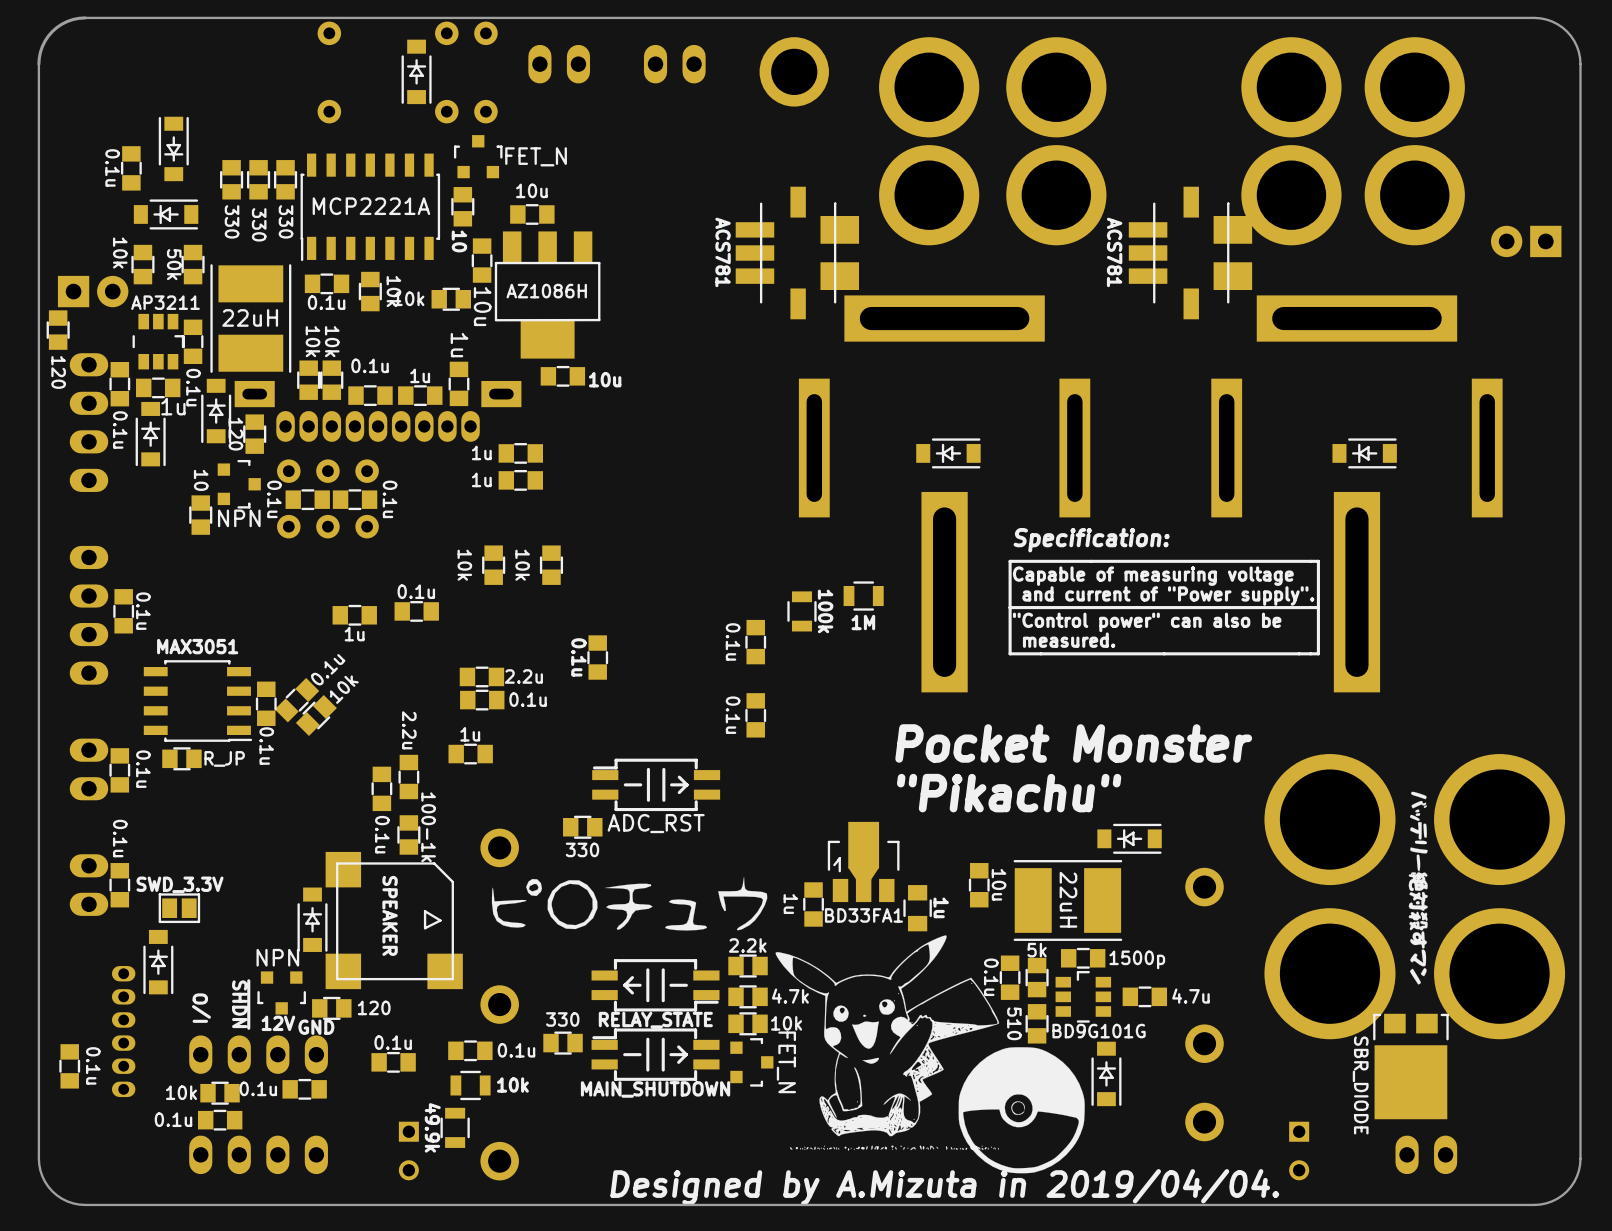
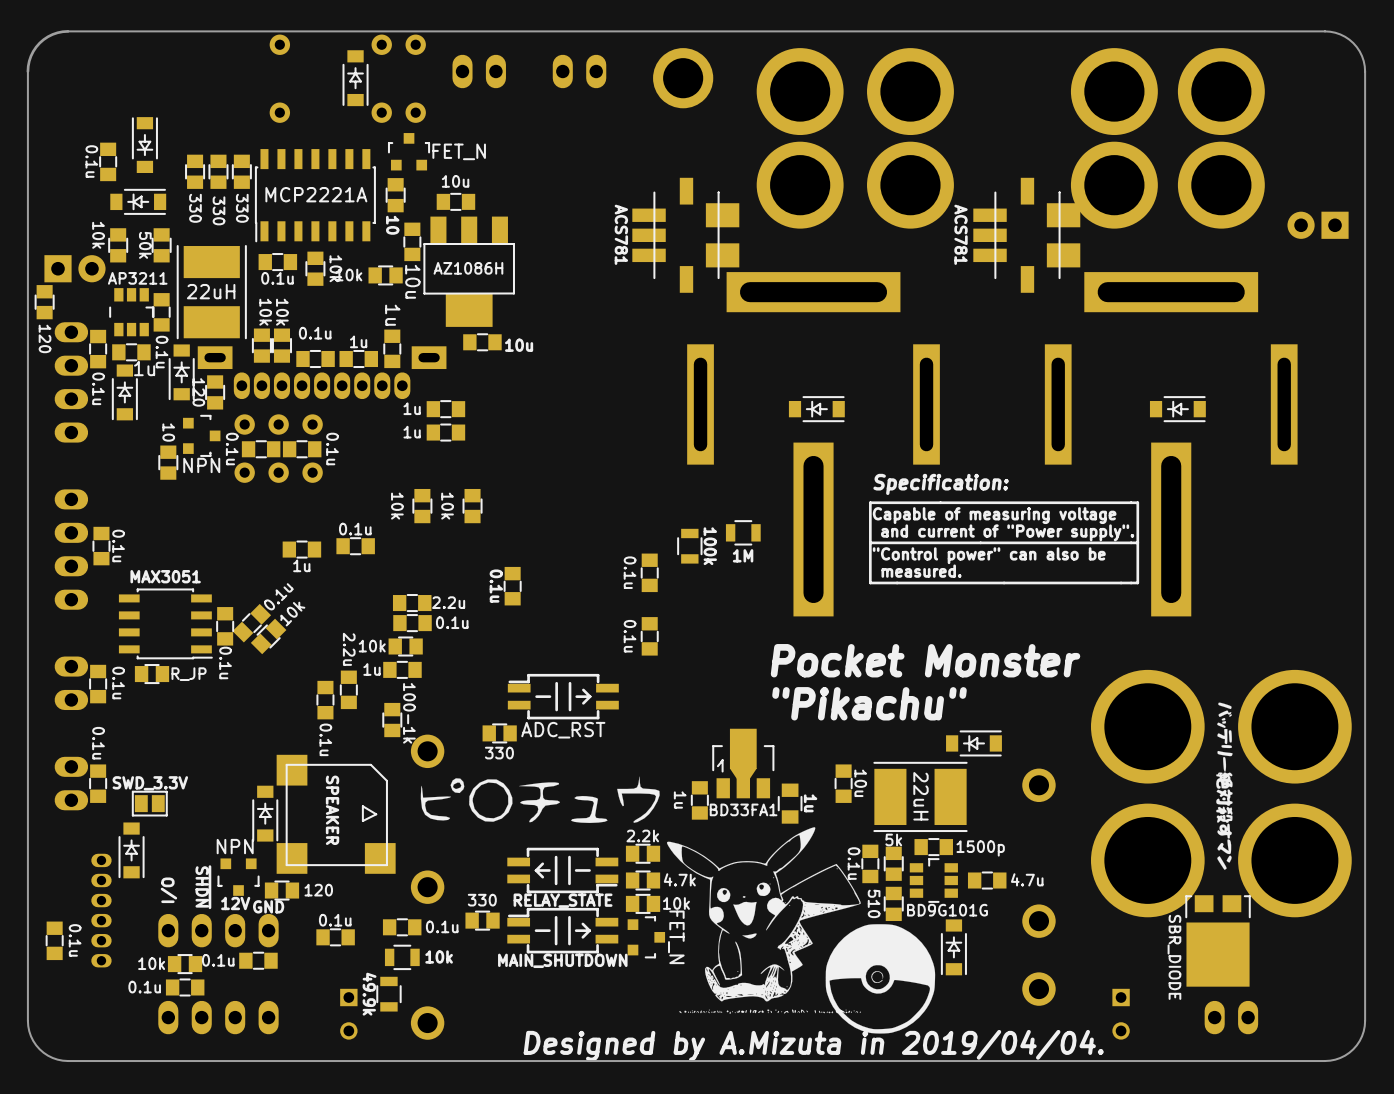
part: none -> 10k (405, 646)
part value position: 1u (470, 734) -> 1u (371, 669)
part position: (408, 834) -> (392, 720)

